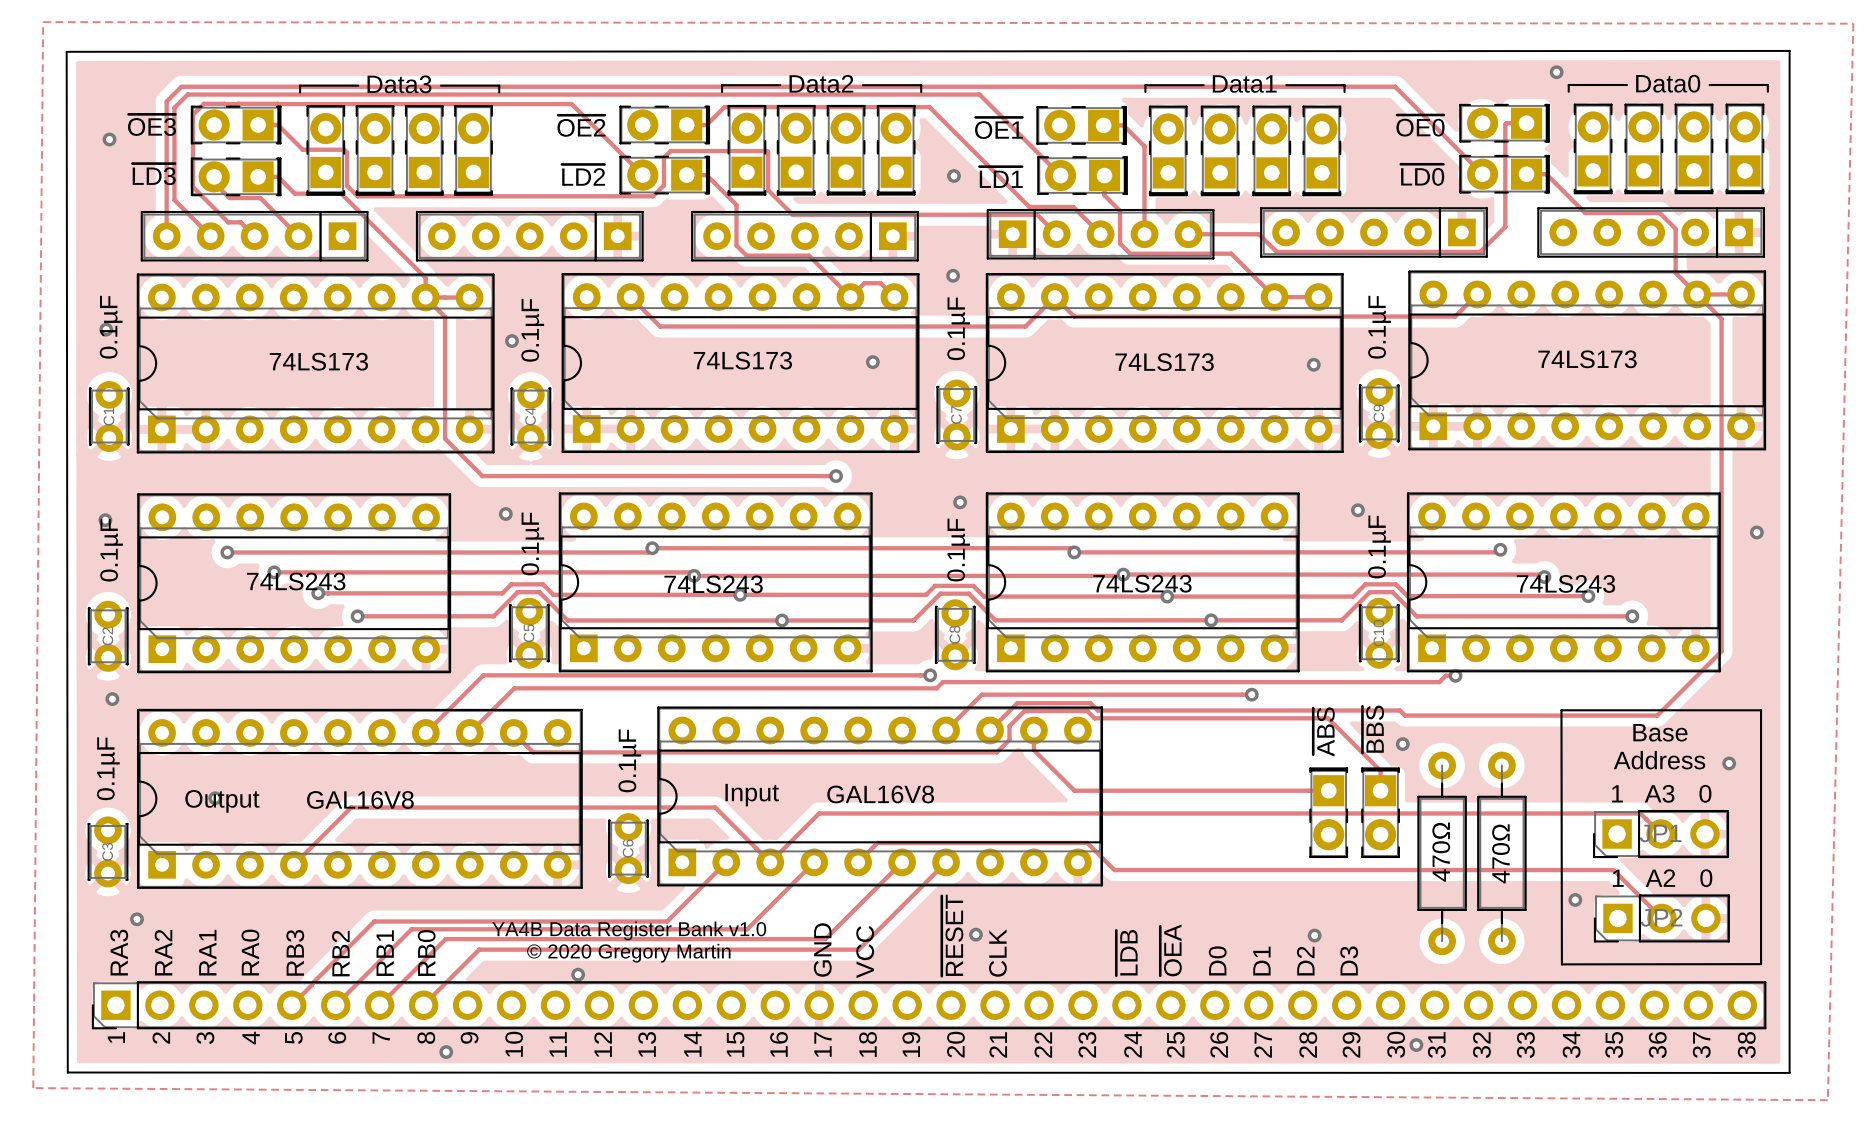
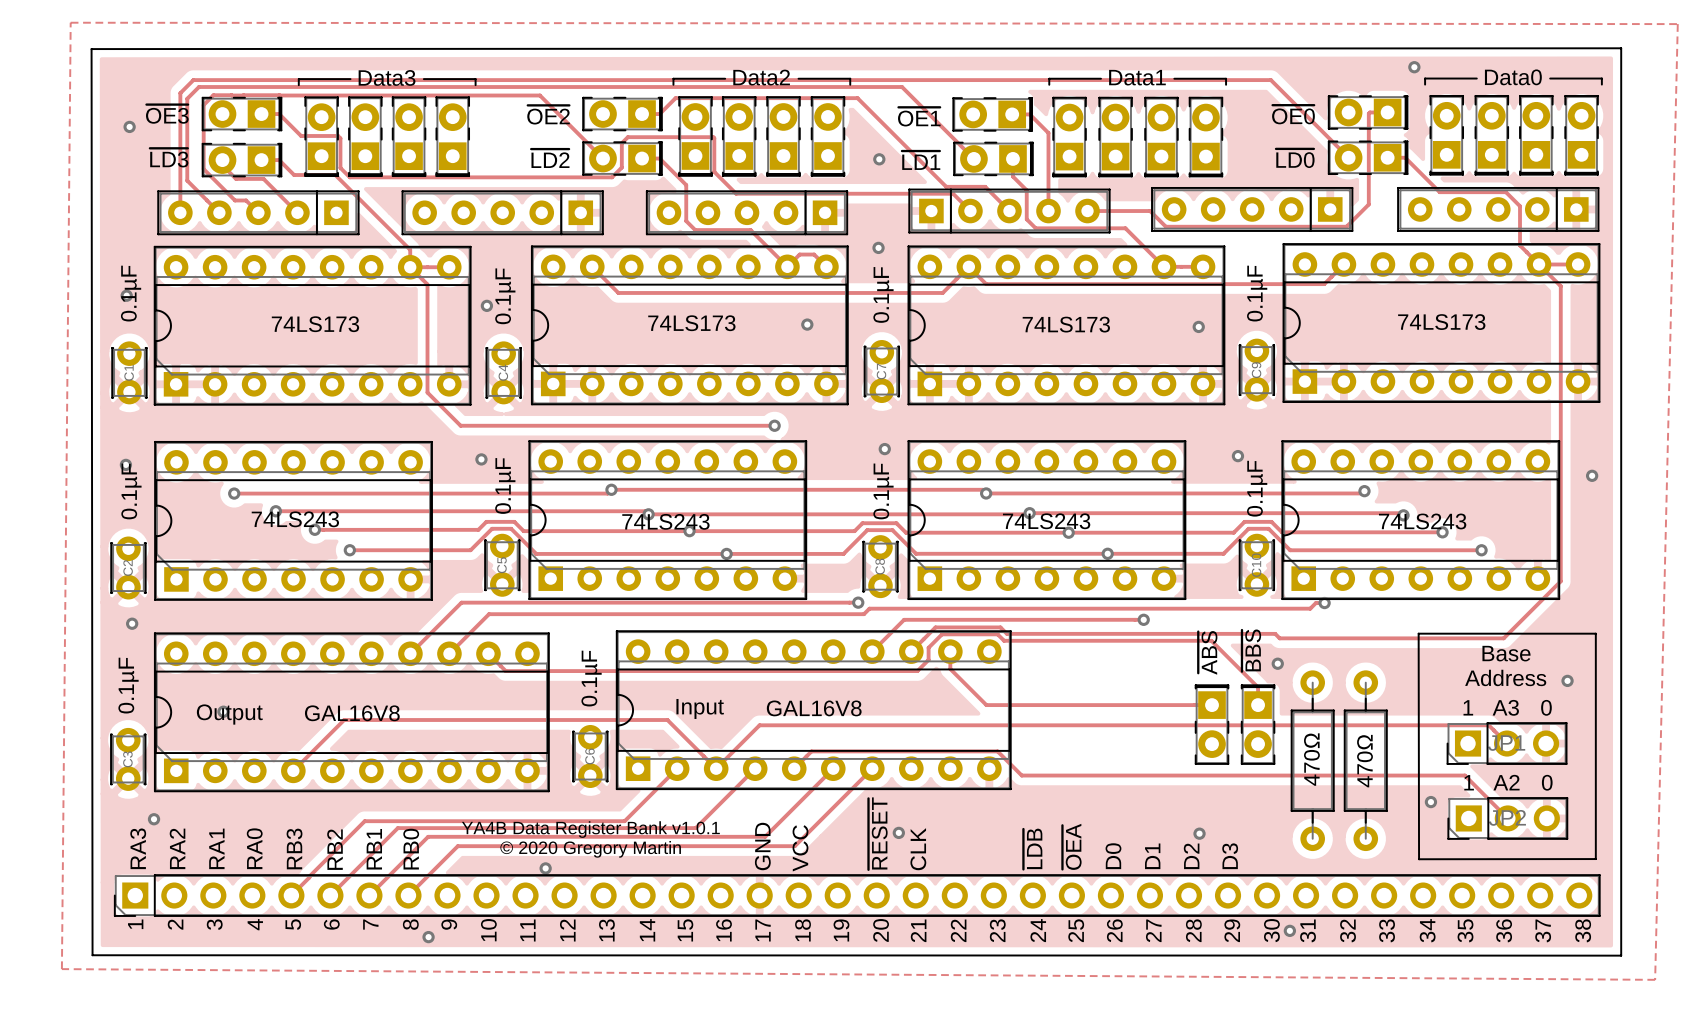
text: YA4B Data Register Bank v1.0 (629, 930) -> YA4B Data Register Bank v1.0.1 (590, 829)

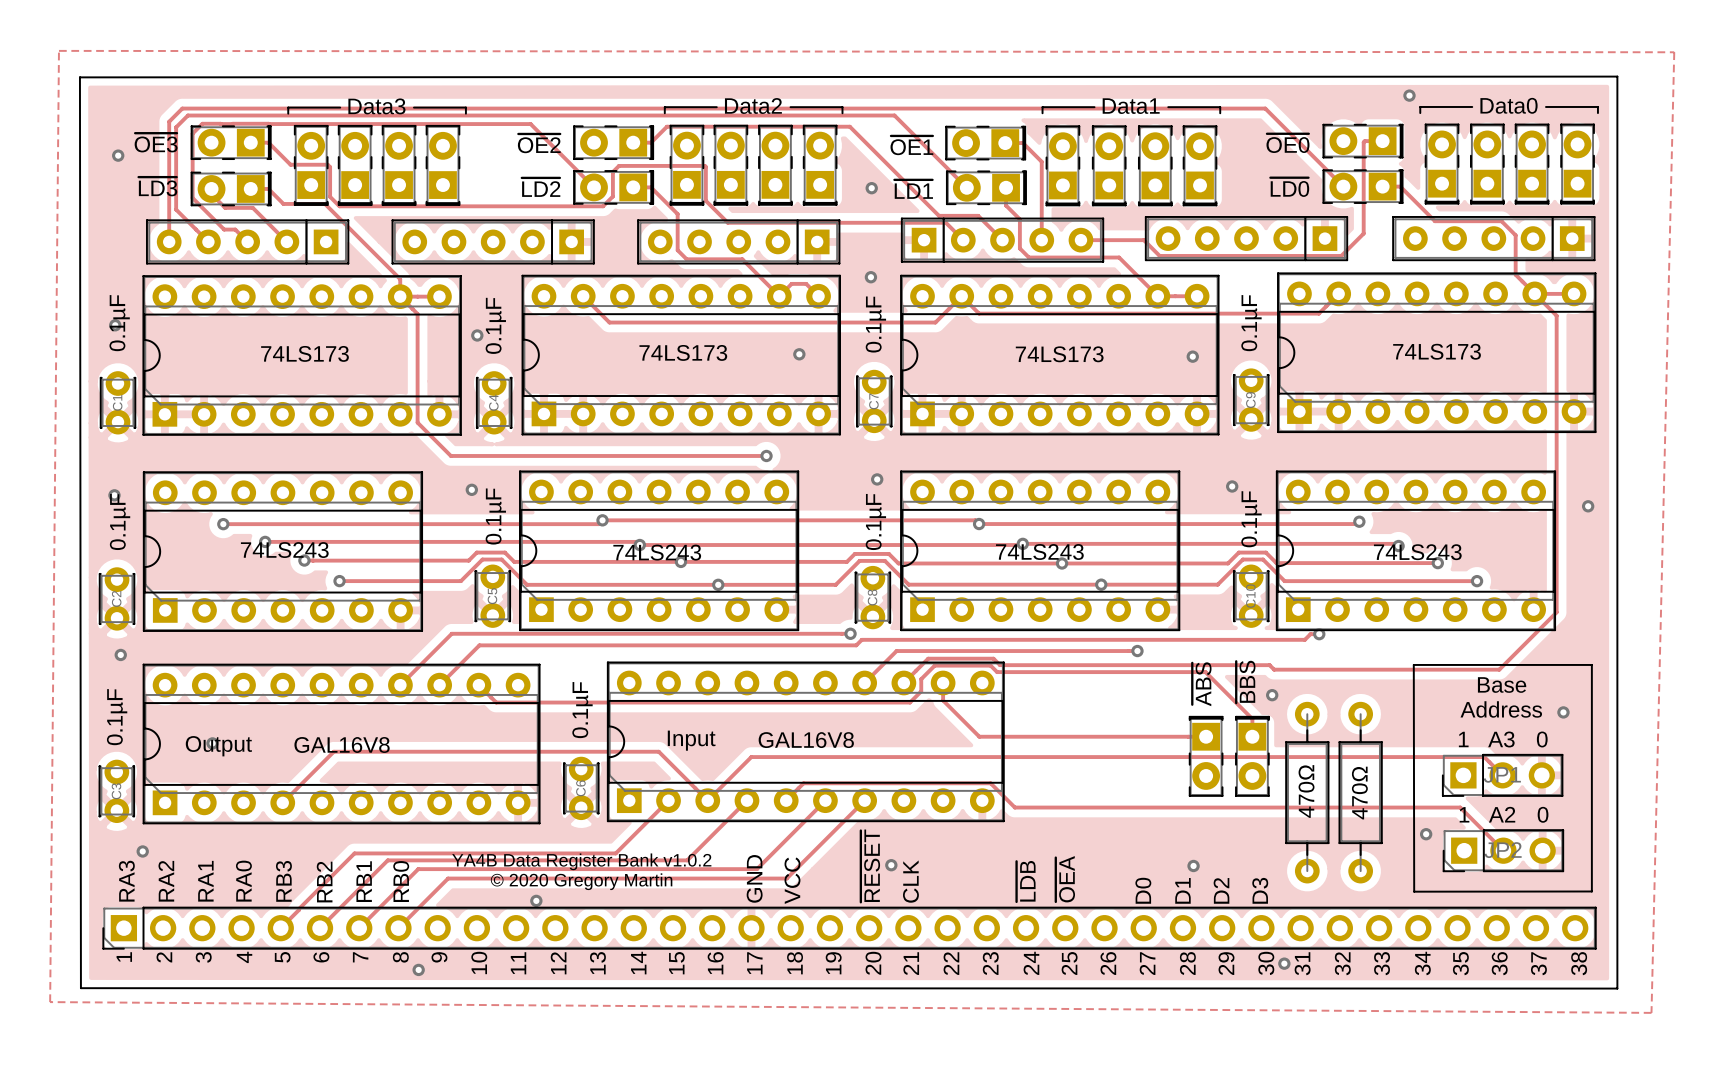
text: YA4B Data Register Bank v1.0.1 (590, 829) -> YA4B Data Register Bank v1.0.2 (581, 861)
text: D0 (1113, 856) -> none
text: D1 (1152, 856) -> D0 (1143, 890)
text: D2 (1191, 856) -> D1 (1182, 890)
text: D3 (1230, 856) -> D2 (1221, 890)
text: none -> D3 (1260, 890)

